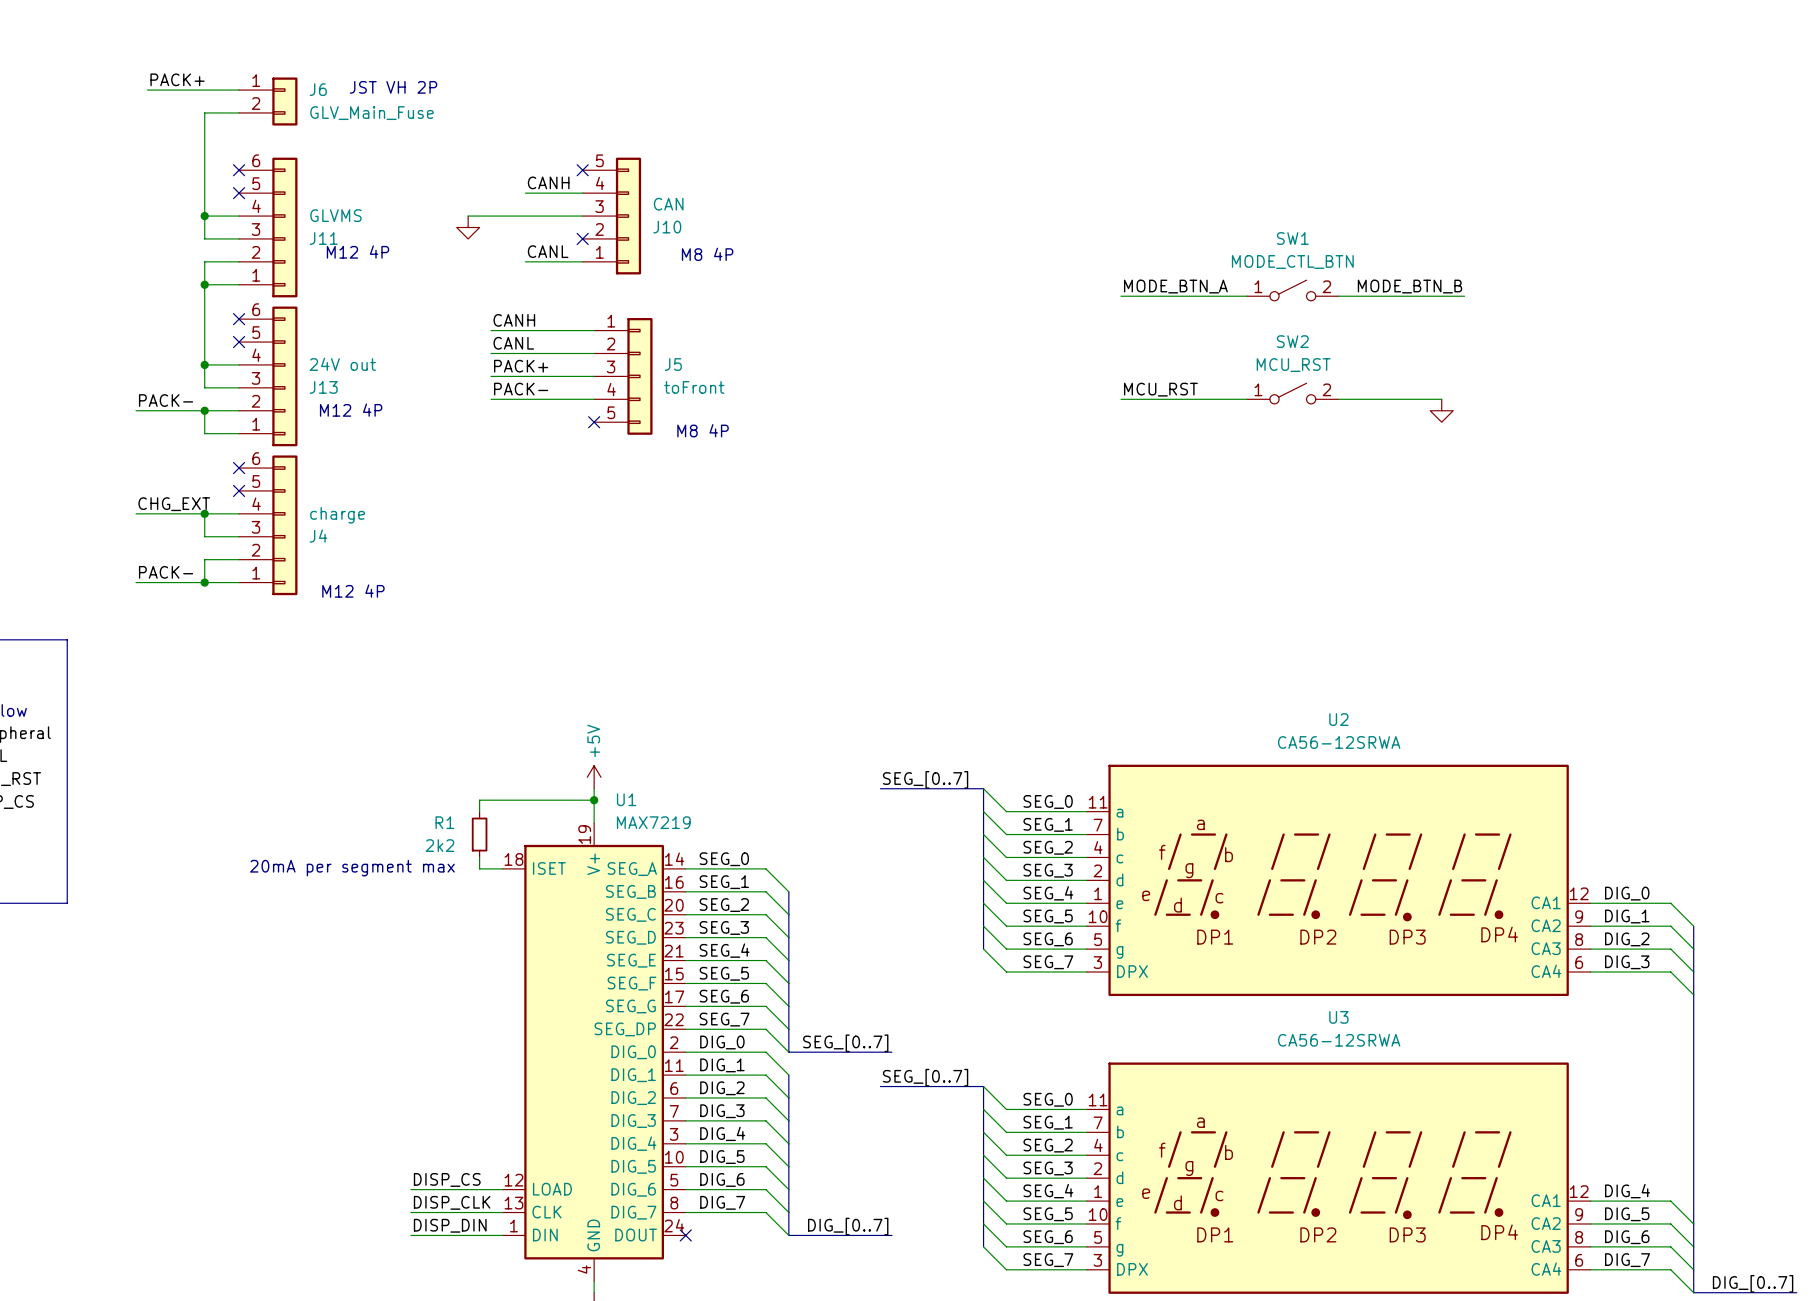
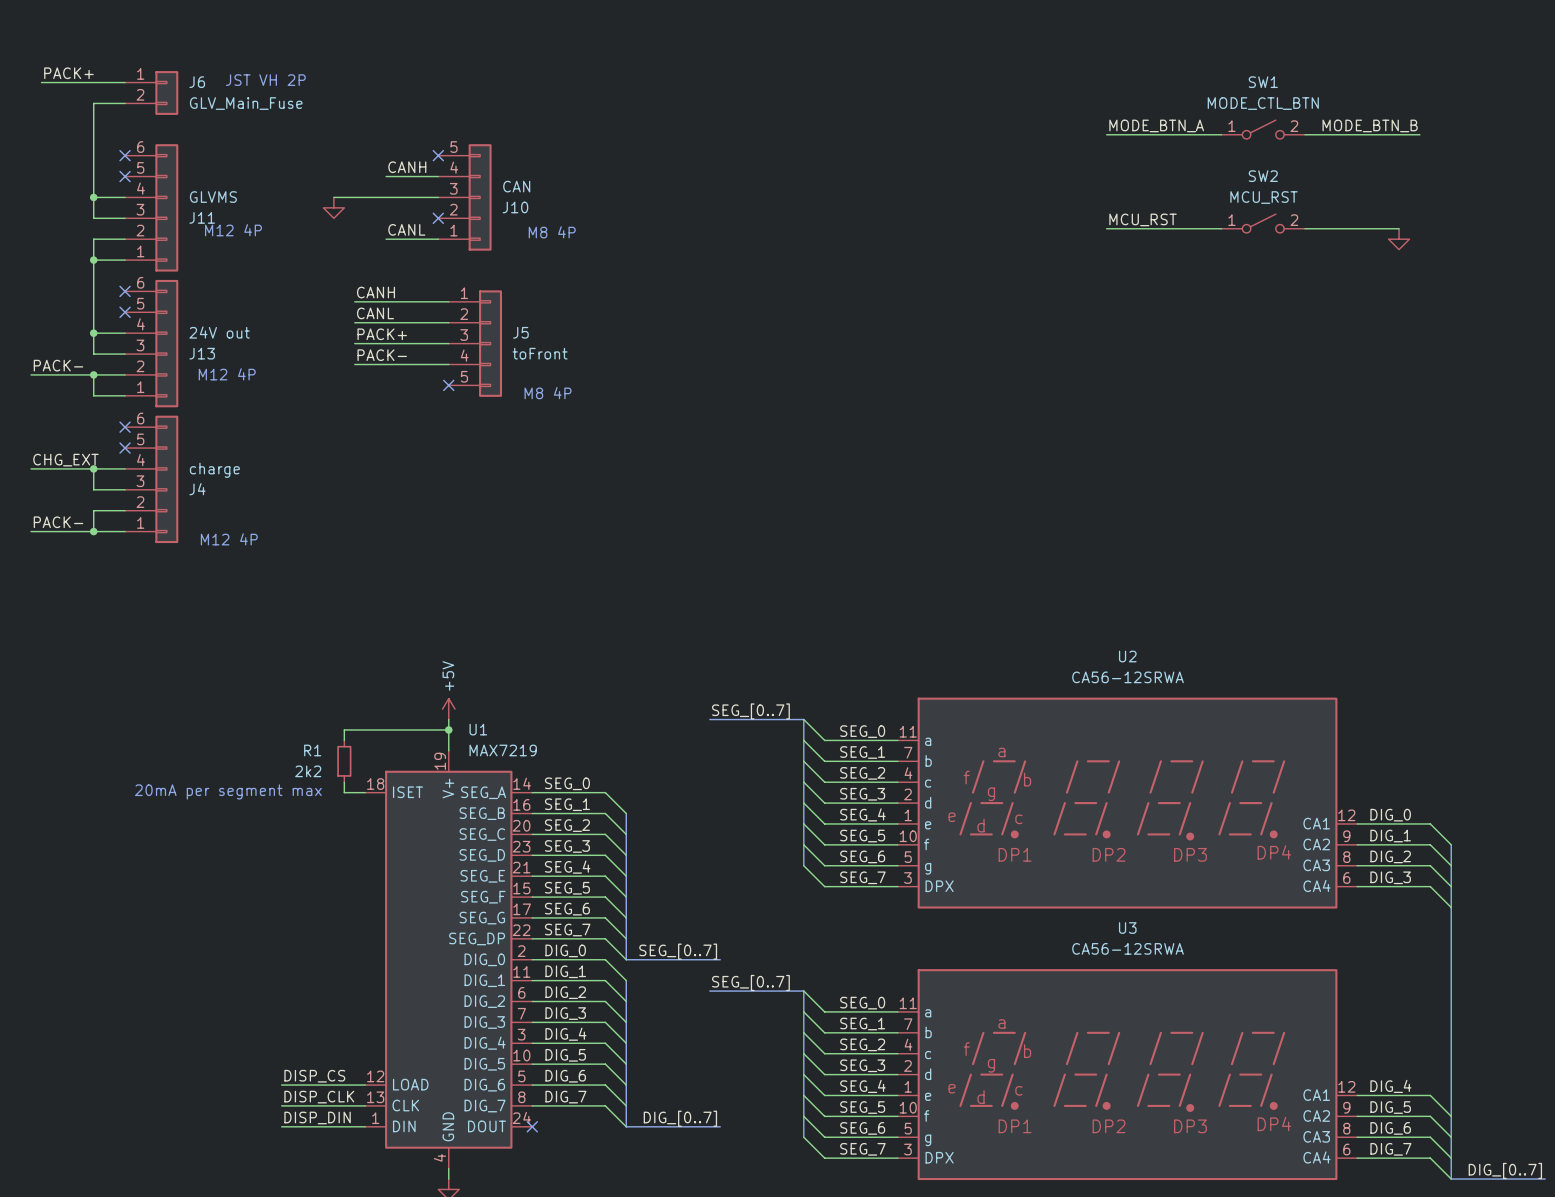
label: none -> MODE_BTN_A (1156, 125)
label: none -> MODE_BTN_B (1370, 125)
wire: none -> (1106, 134) (1221, 134)
wire: none -> (1305, 134) (1419, 134)
label: none -> MCU_RST (1143, 219)
wire: none -> (1305, 228) (1399, 228)
power symbol: none -> (1399, 239)
label: MODE_BTN_A (1175, 286) -> none
label: MODE_BTN_B (1409, 286) -> none
SW1 position: (1292, 290) -> (1263, 129)
wire: (1121, 296) (1247, 296) -> none
wire: (1338, 296) (1464, 296) -> (1106, 228) (1221, 228)
label: MCU_RST (1160, 389) -> none
SW2 position: (1292, 393) -> (1263, 223)
wire: (1121, 399) (1247, 399) -> none
wire: (1338, 399) (1441, 399) -> none
power symbol: (1441, 410) -> none

